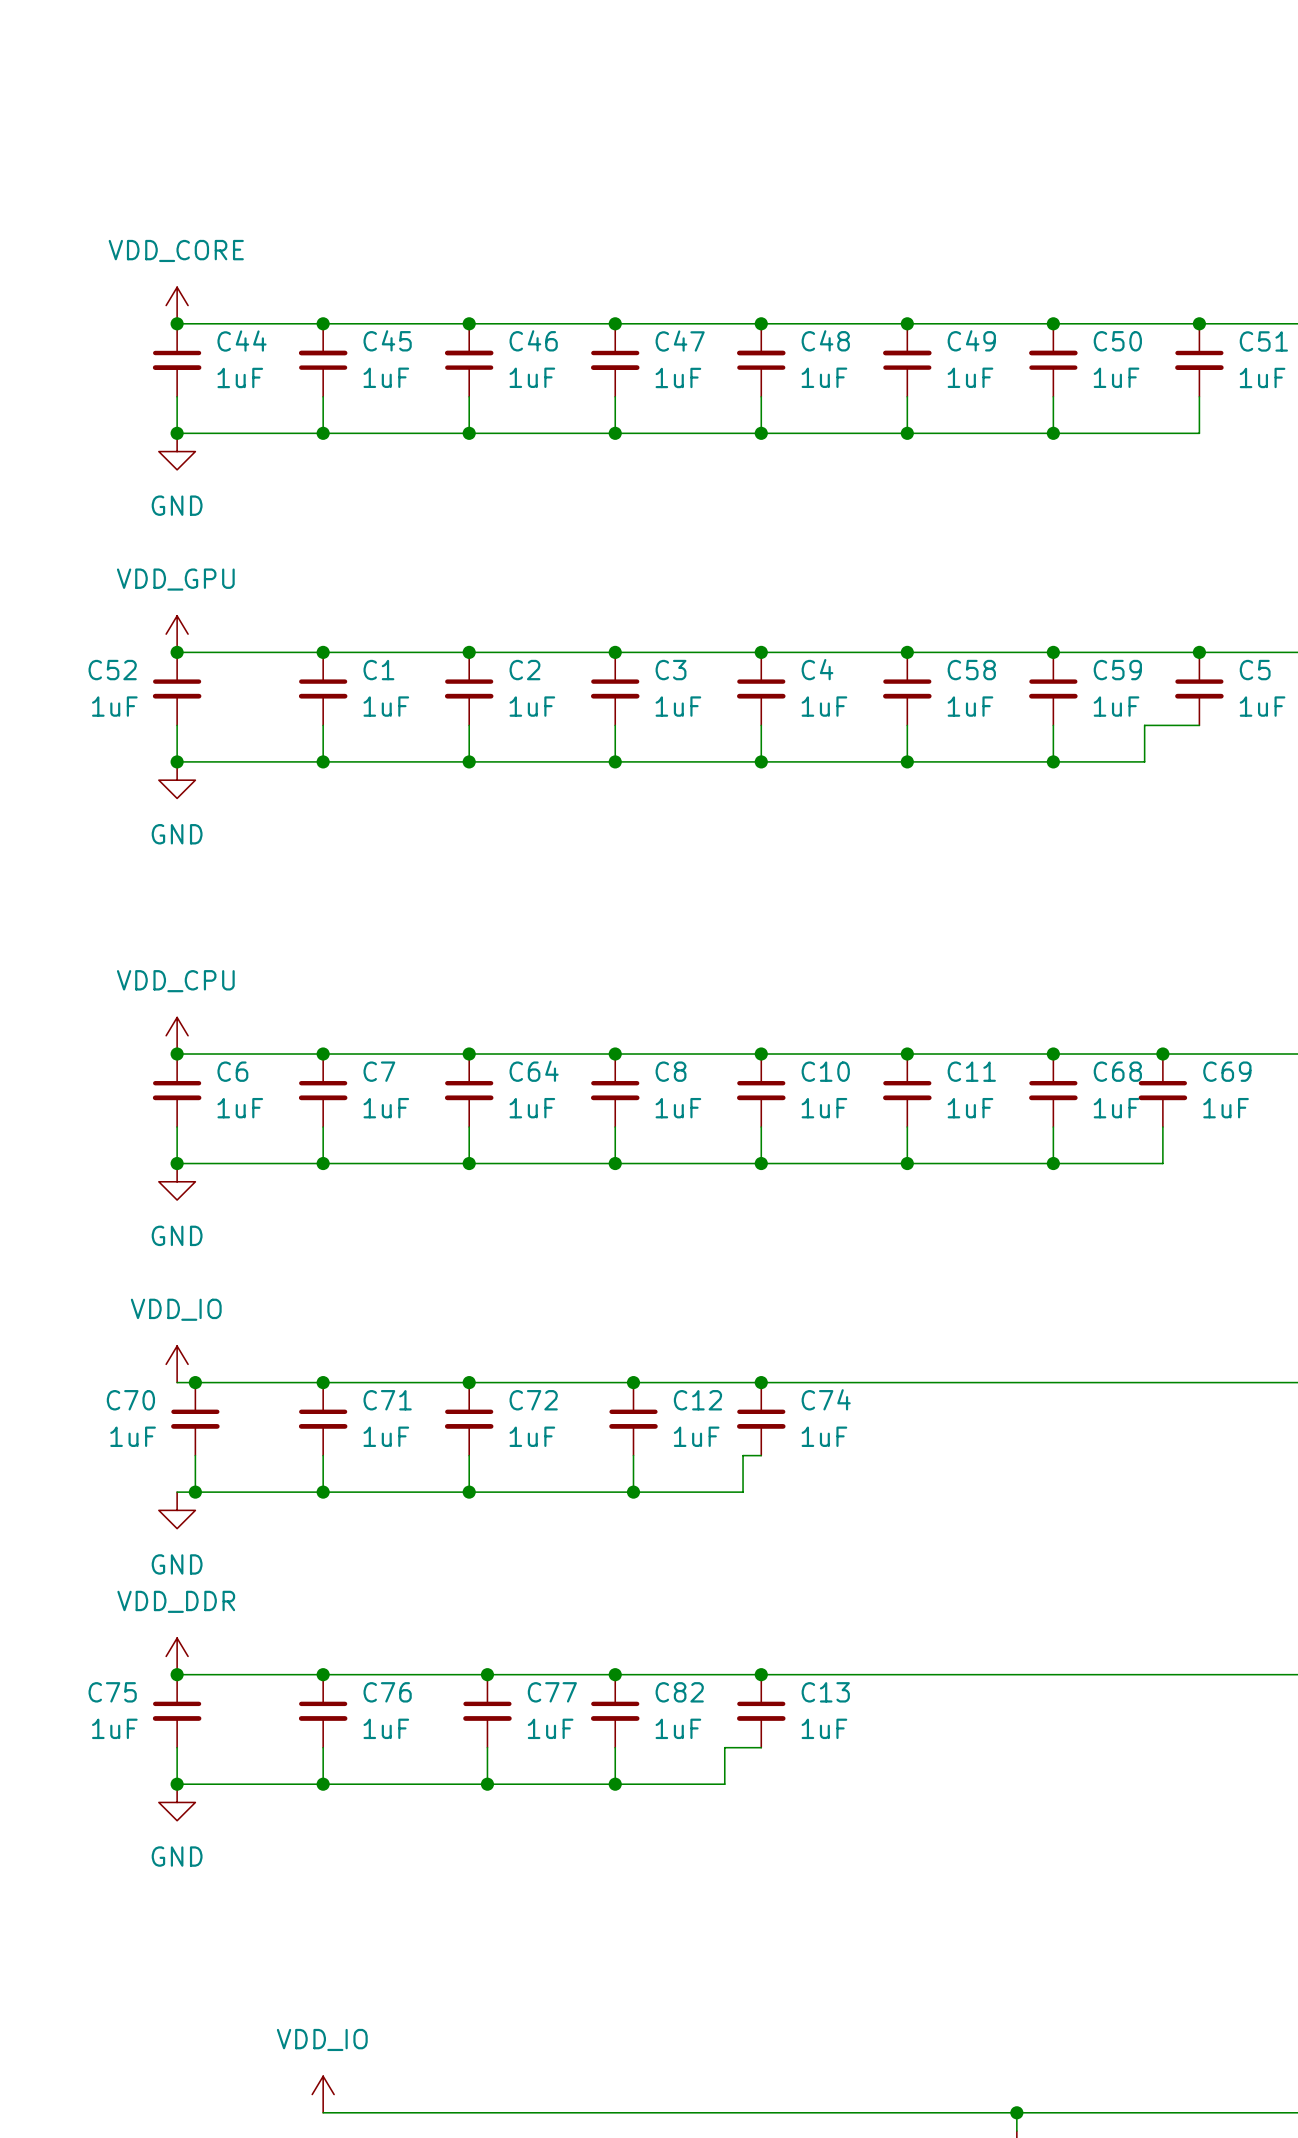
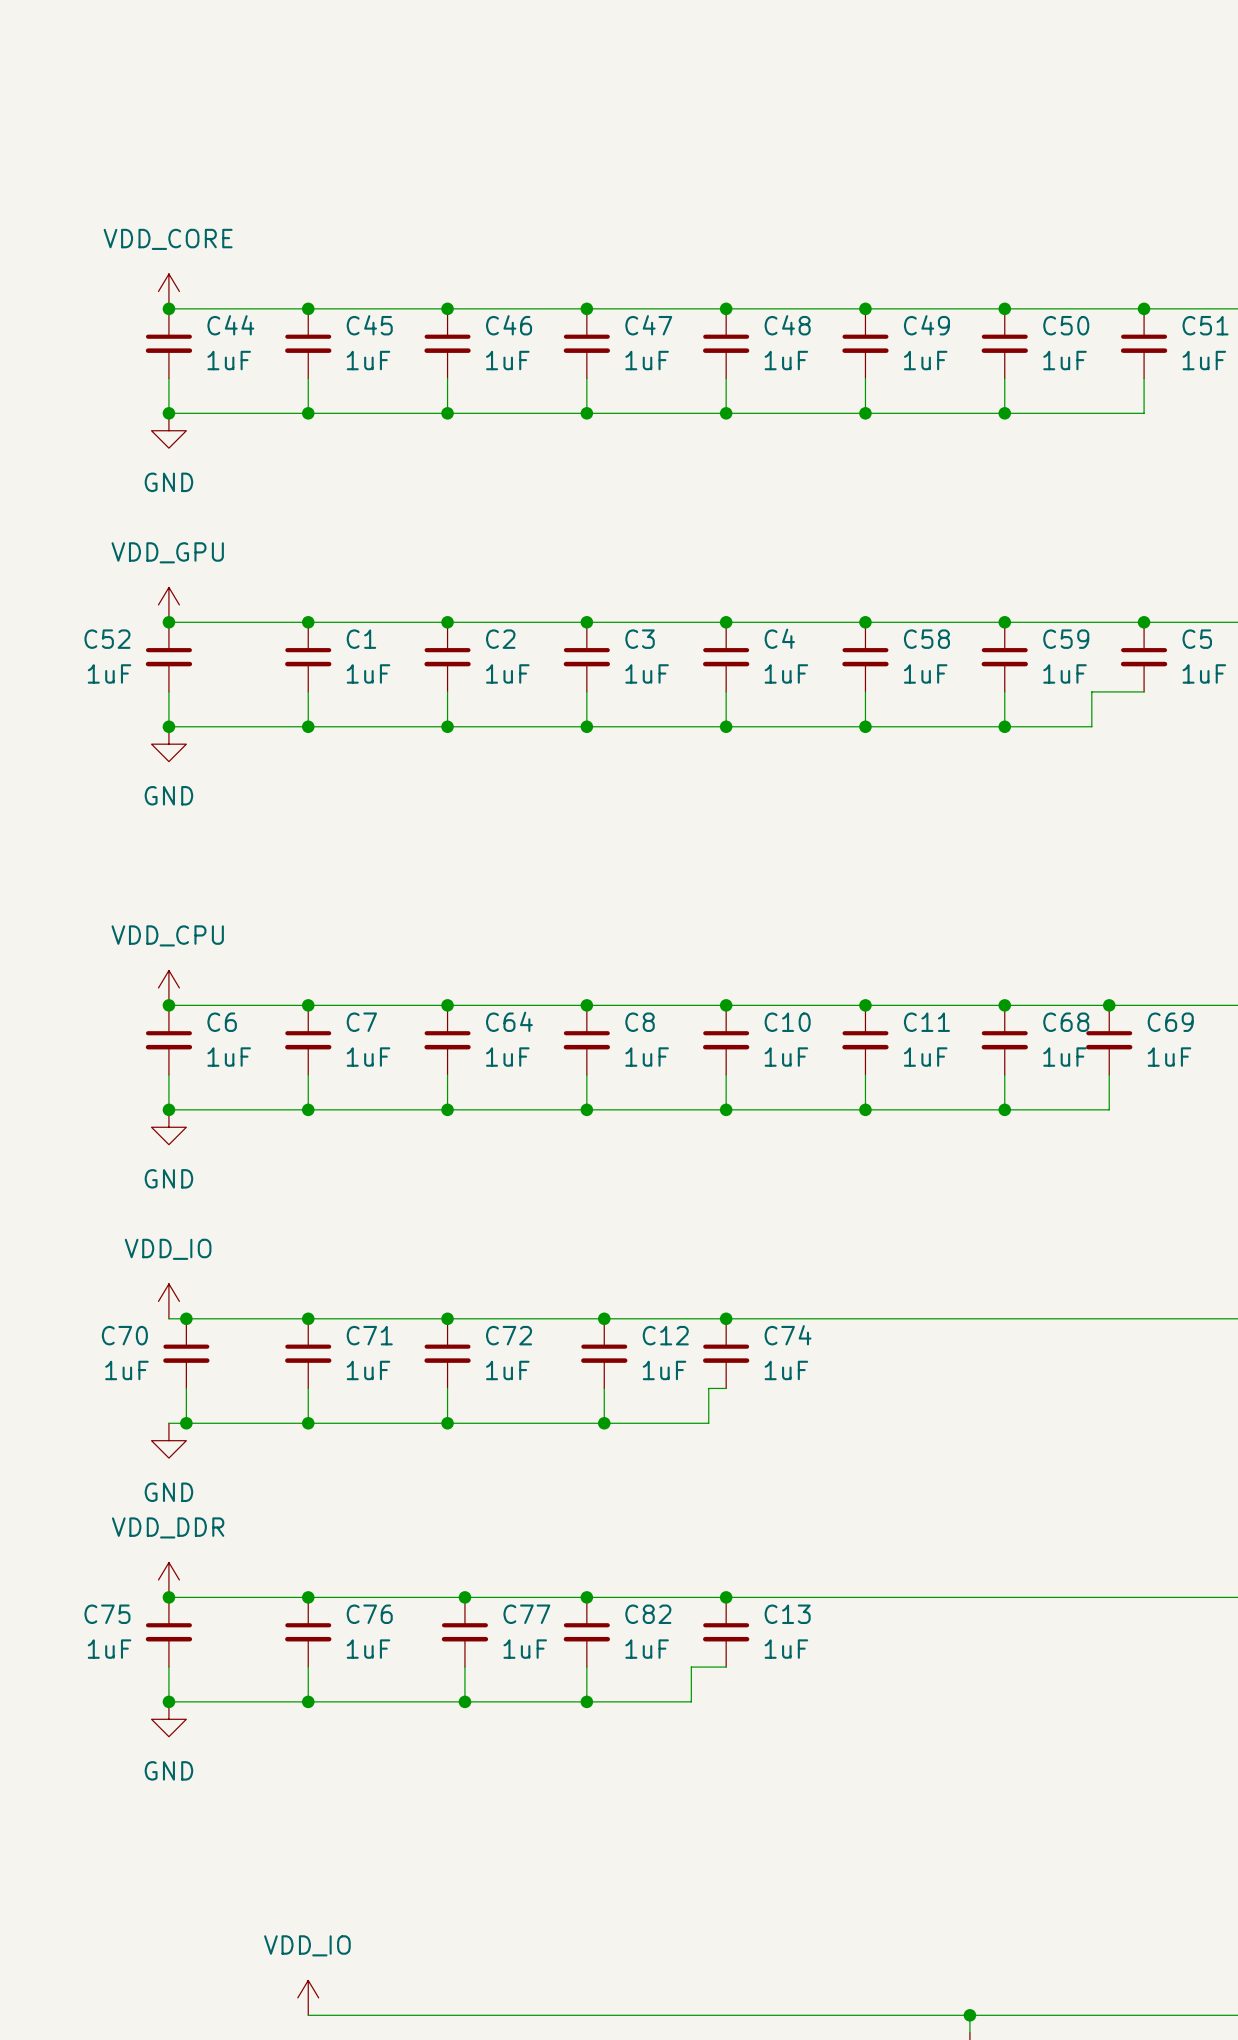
C45 rotation: 0° (323, 360) -> 180° (308, 343)
C46 rotation: 0° (469, 360) -> 180° (447, 343)
C48 rotation: 0° (761, 360) -> 180° (726, 343)
C49 rotation: 0° (907, 360) -> 180° (865, 343)
C50 rotation: 0° (1053, 360) -> 180° (1004, 343)

